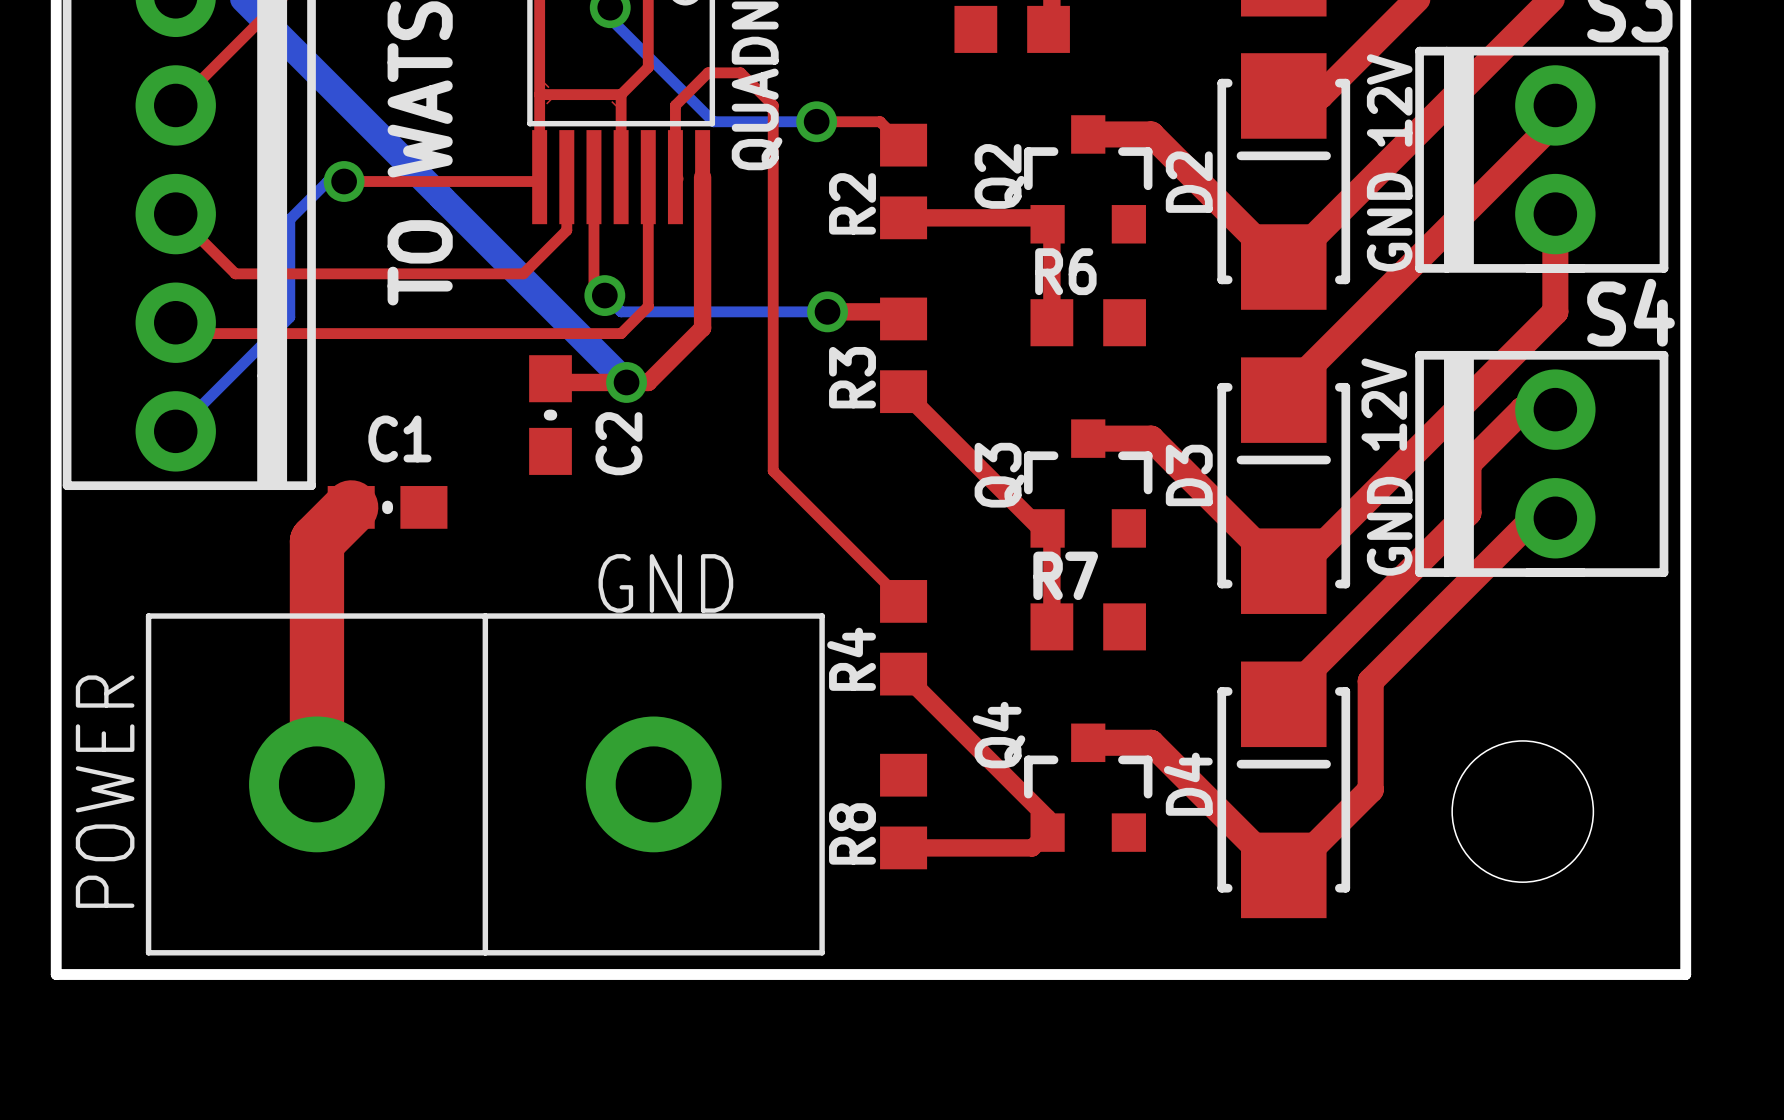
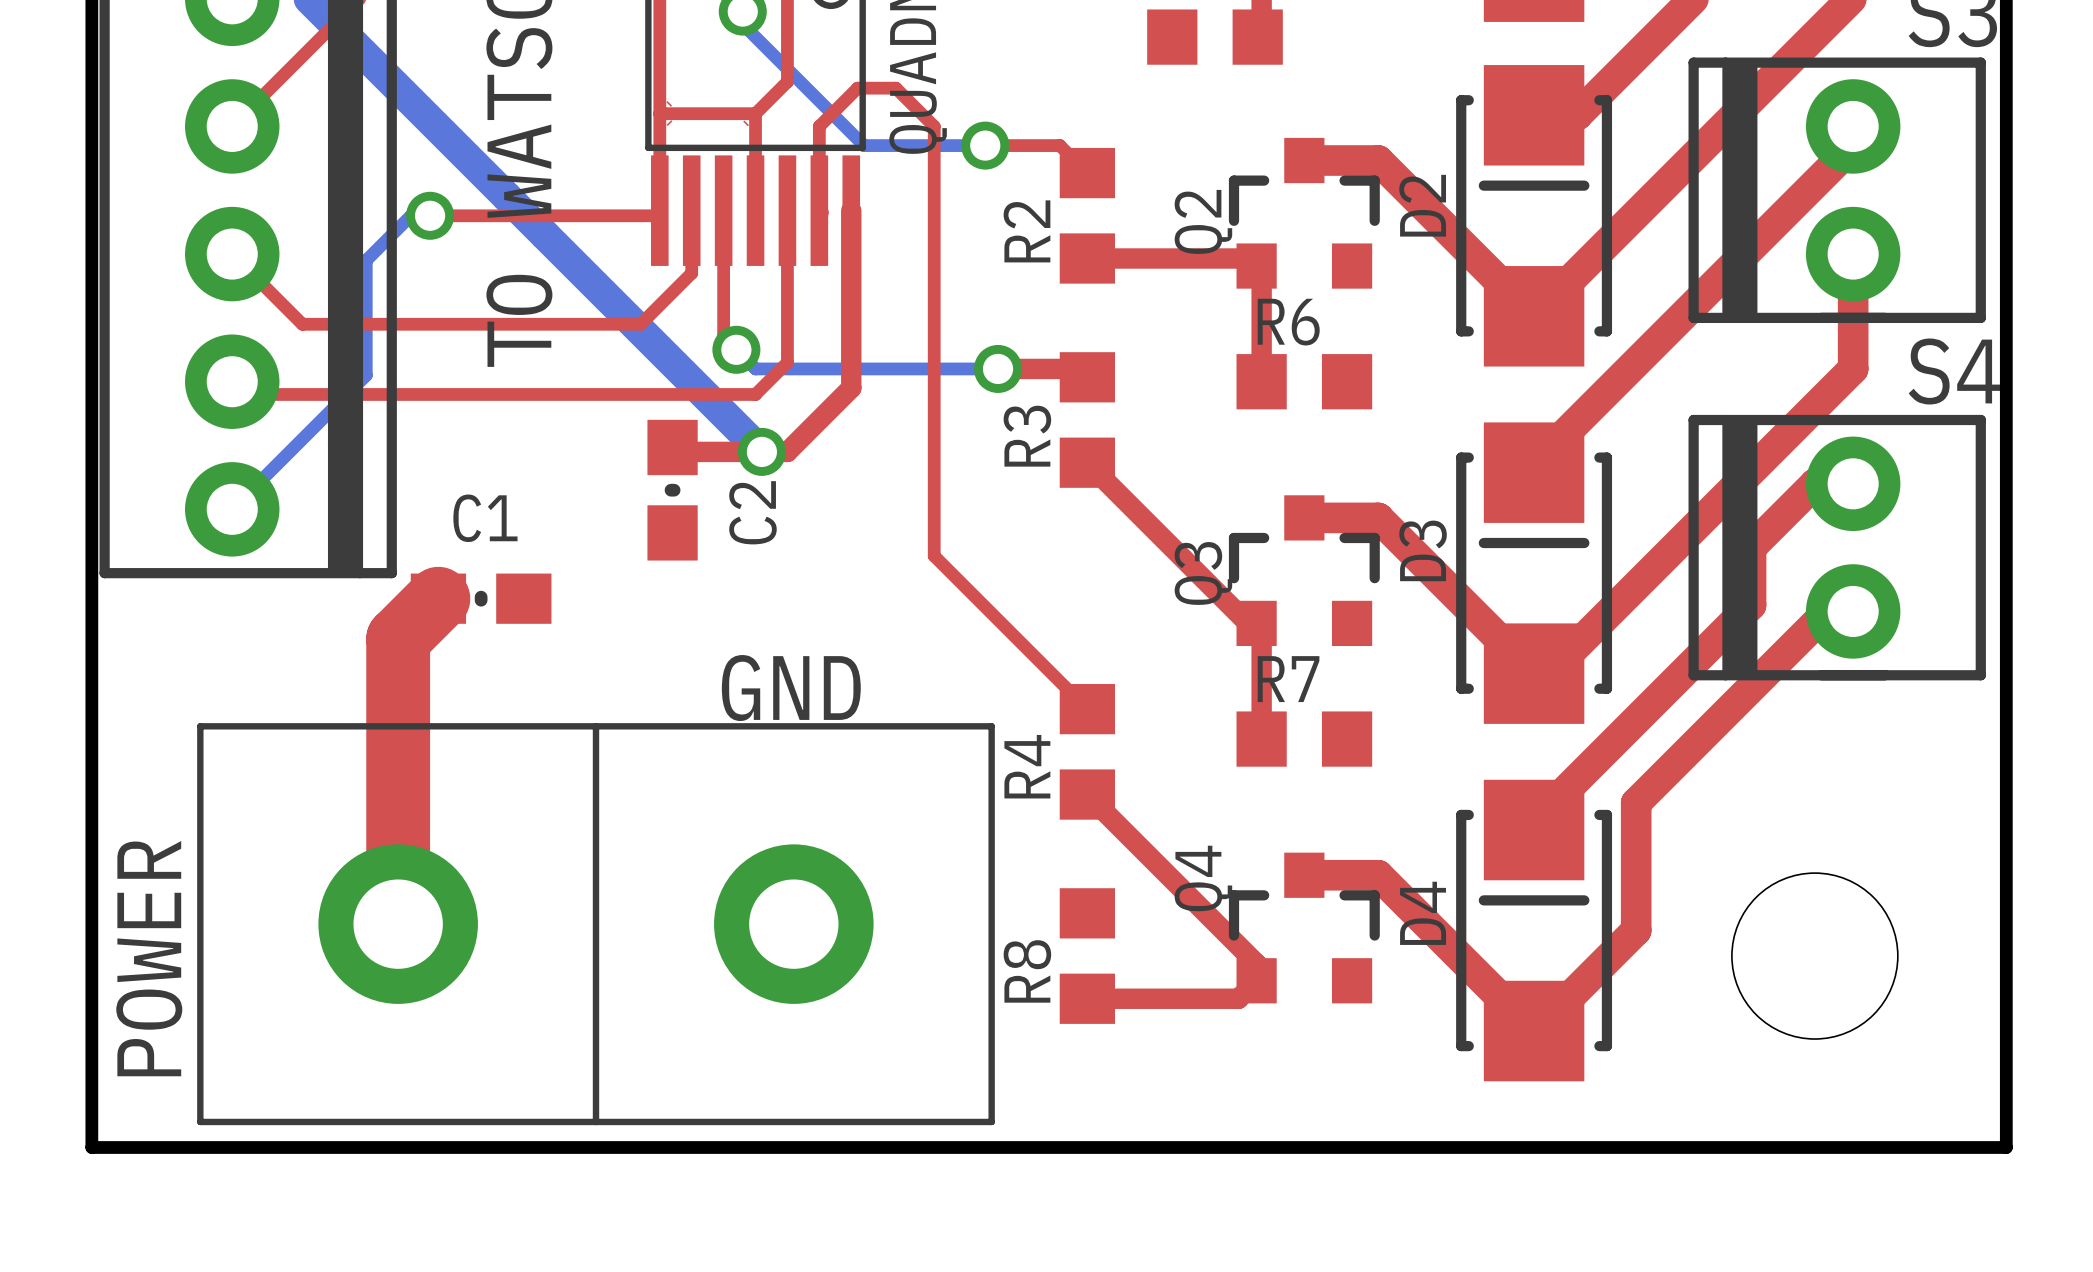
text: 12V (1389, 100) -> none
text: GND (1389, 222) -> none
text: 12V (1384, 404) -> none
text: GND (1389, 526) -> none

